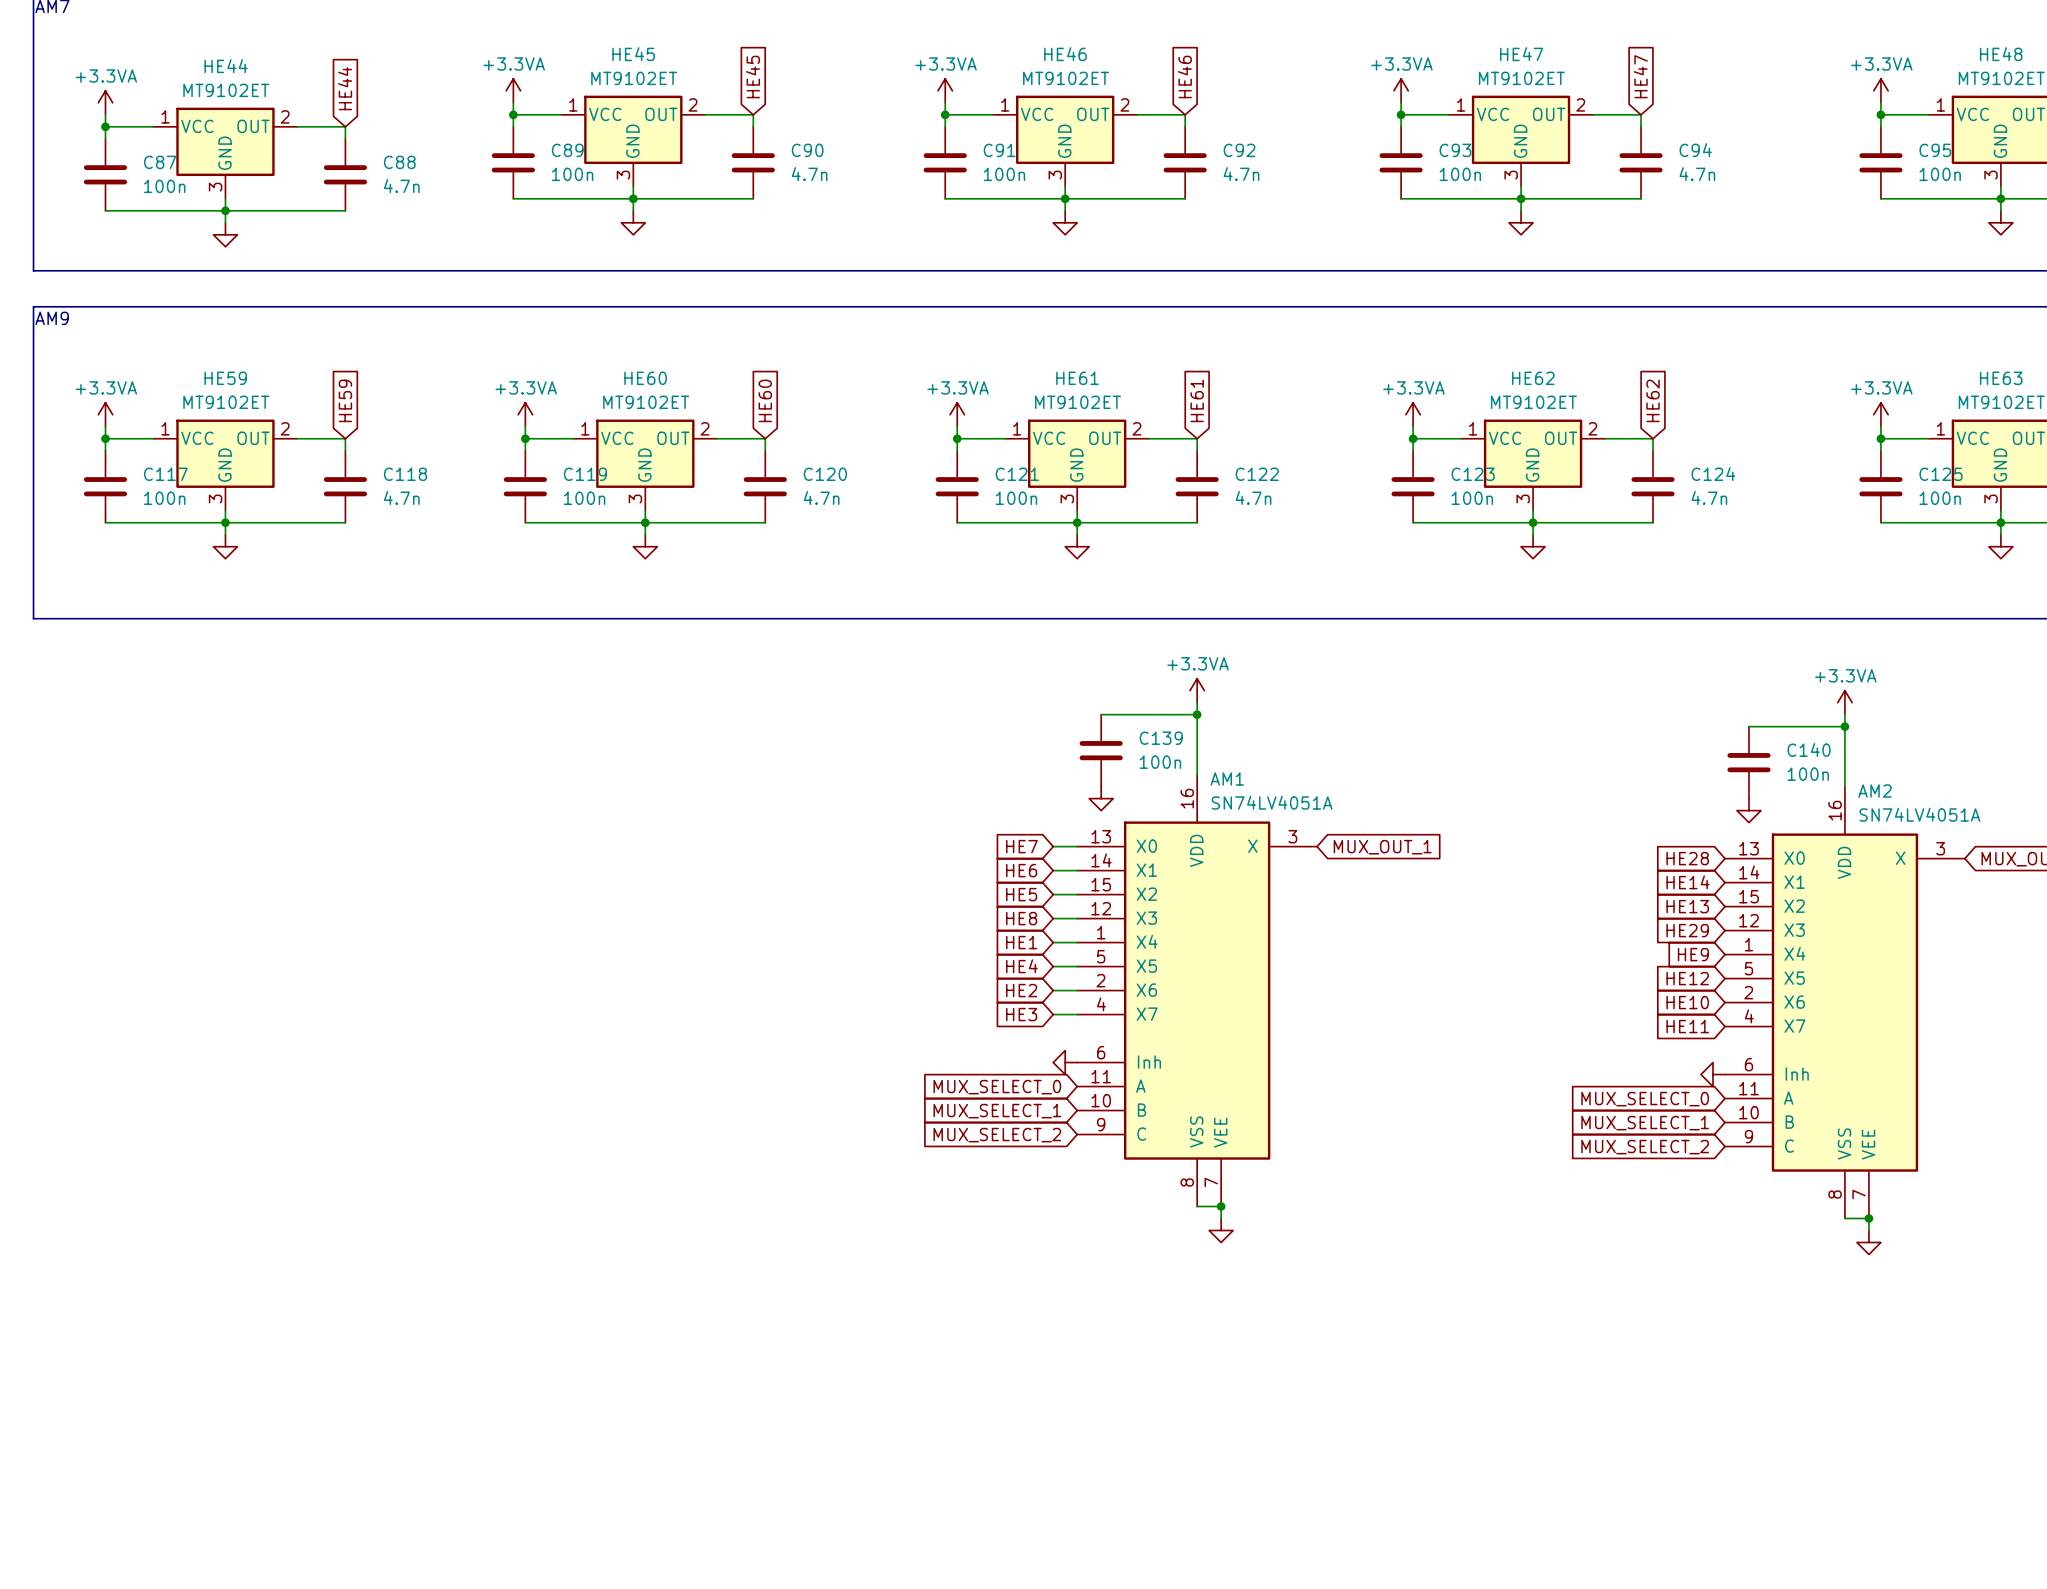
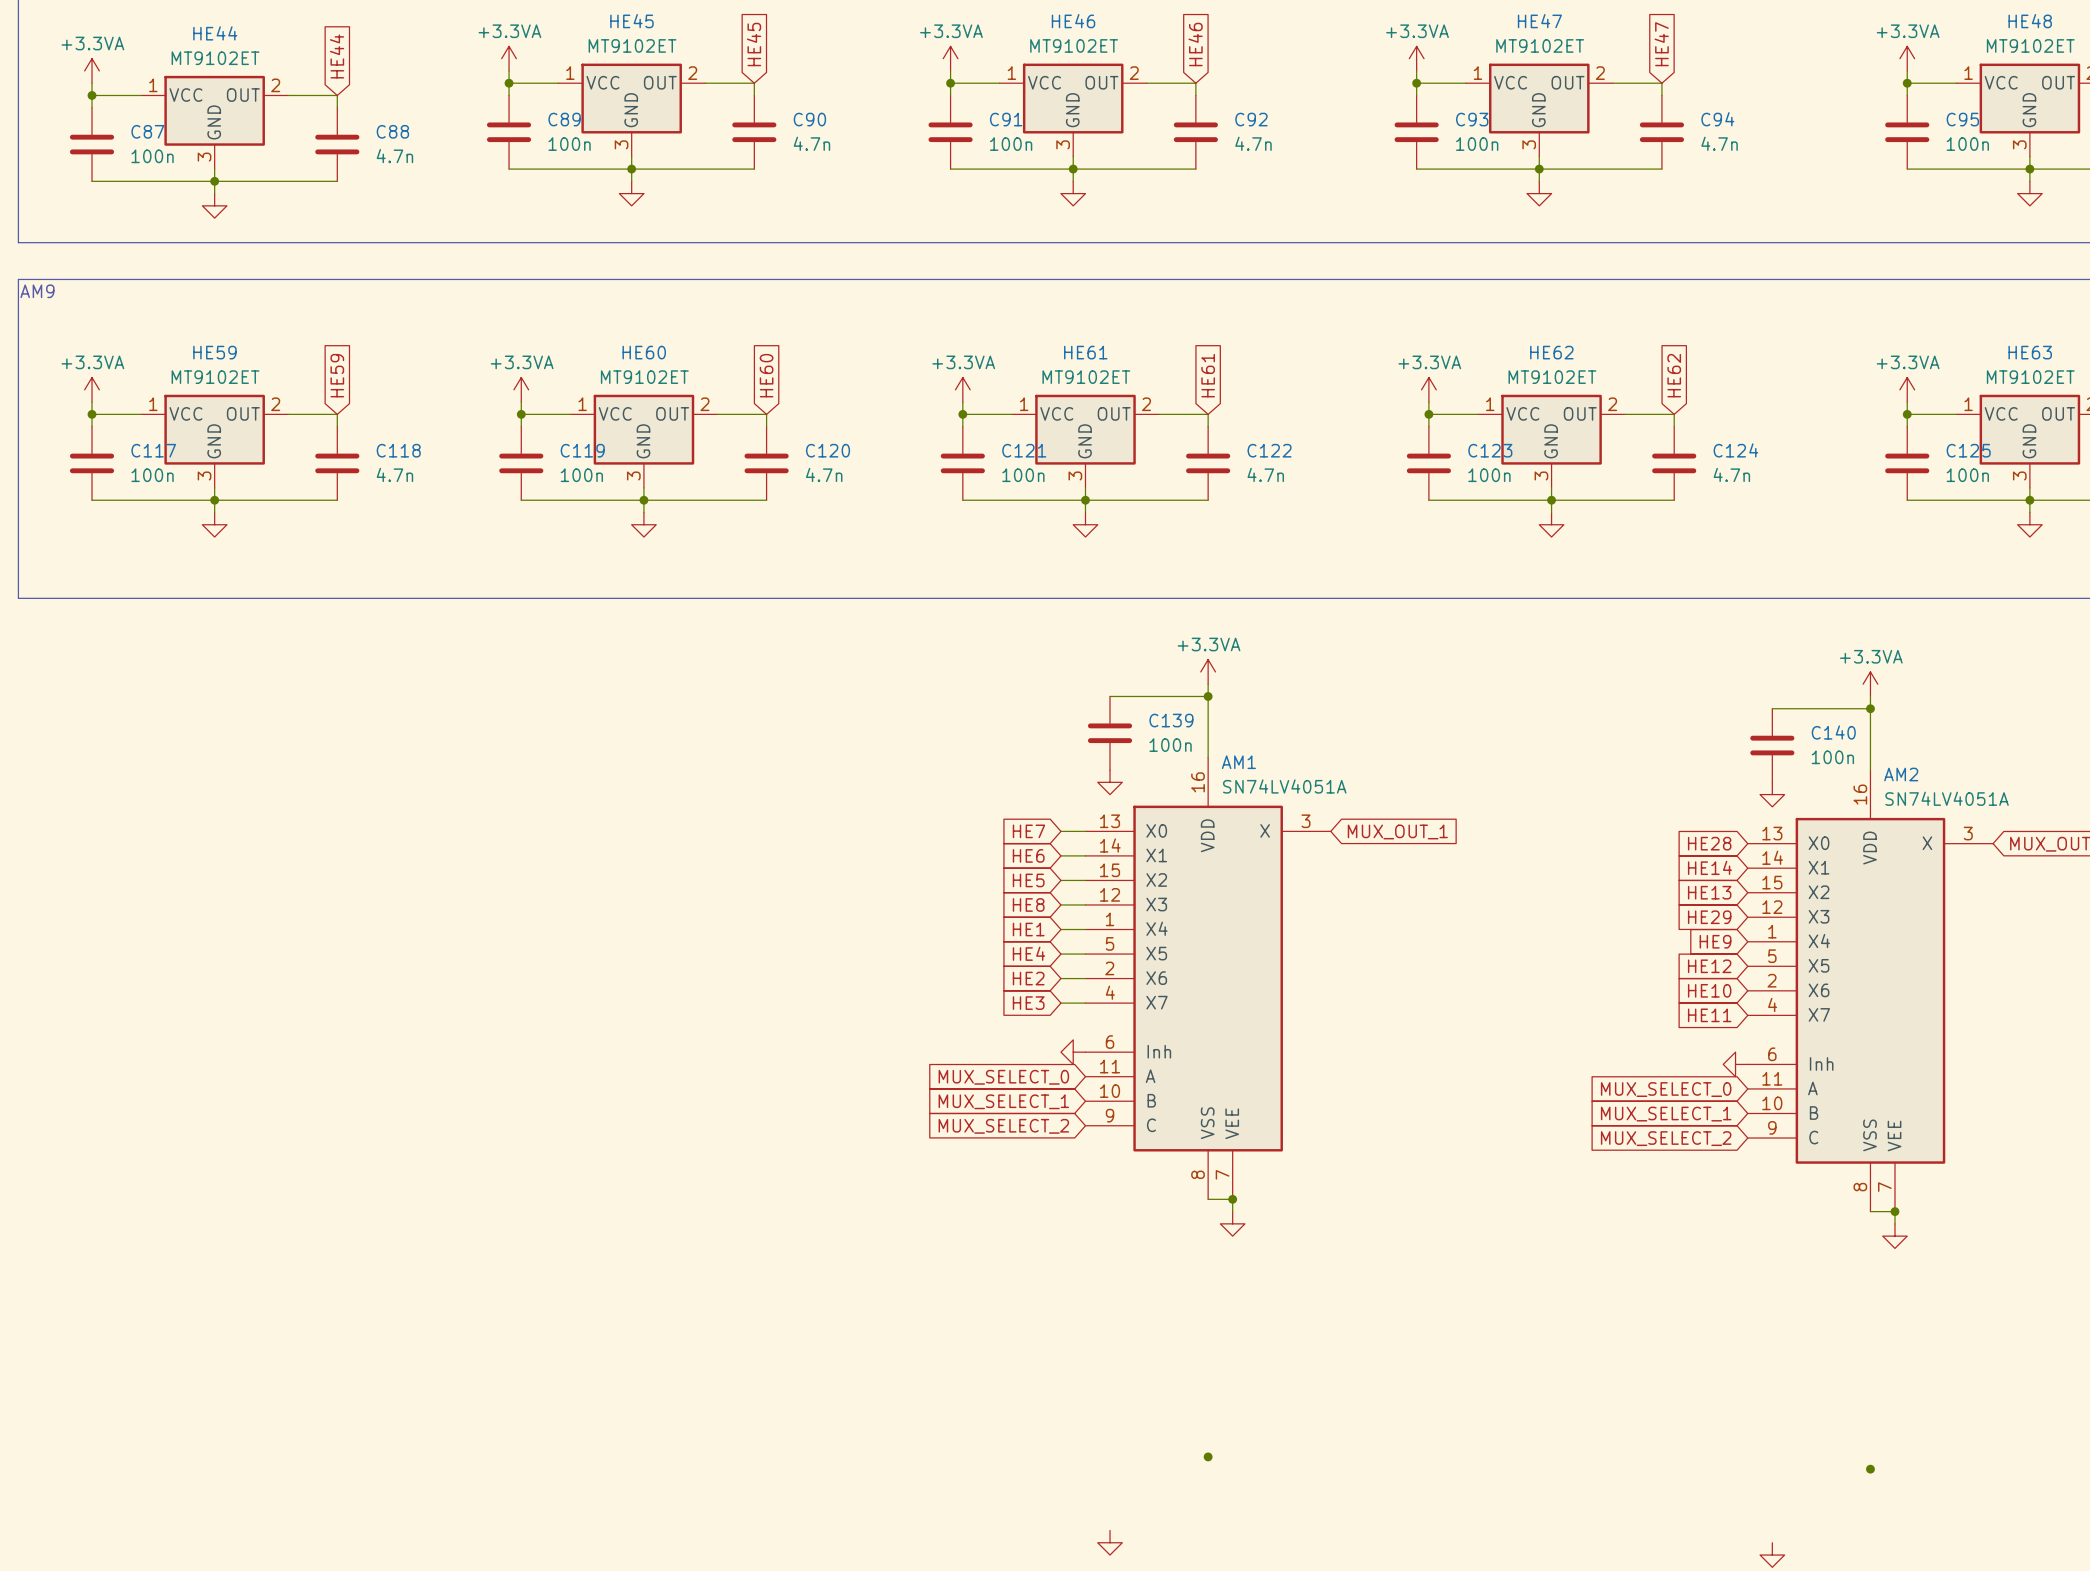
junction: none -> (1208, 1456)
junction: none -> (1870, 1469)
power symbol: none -> (1110, 1542)
power symbol: none -> (1772, 1555)

